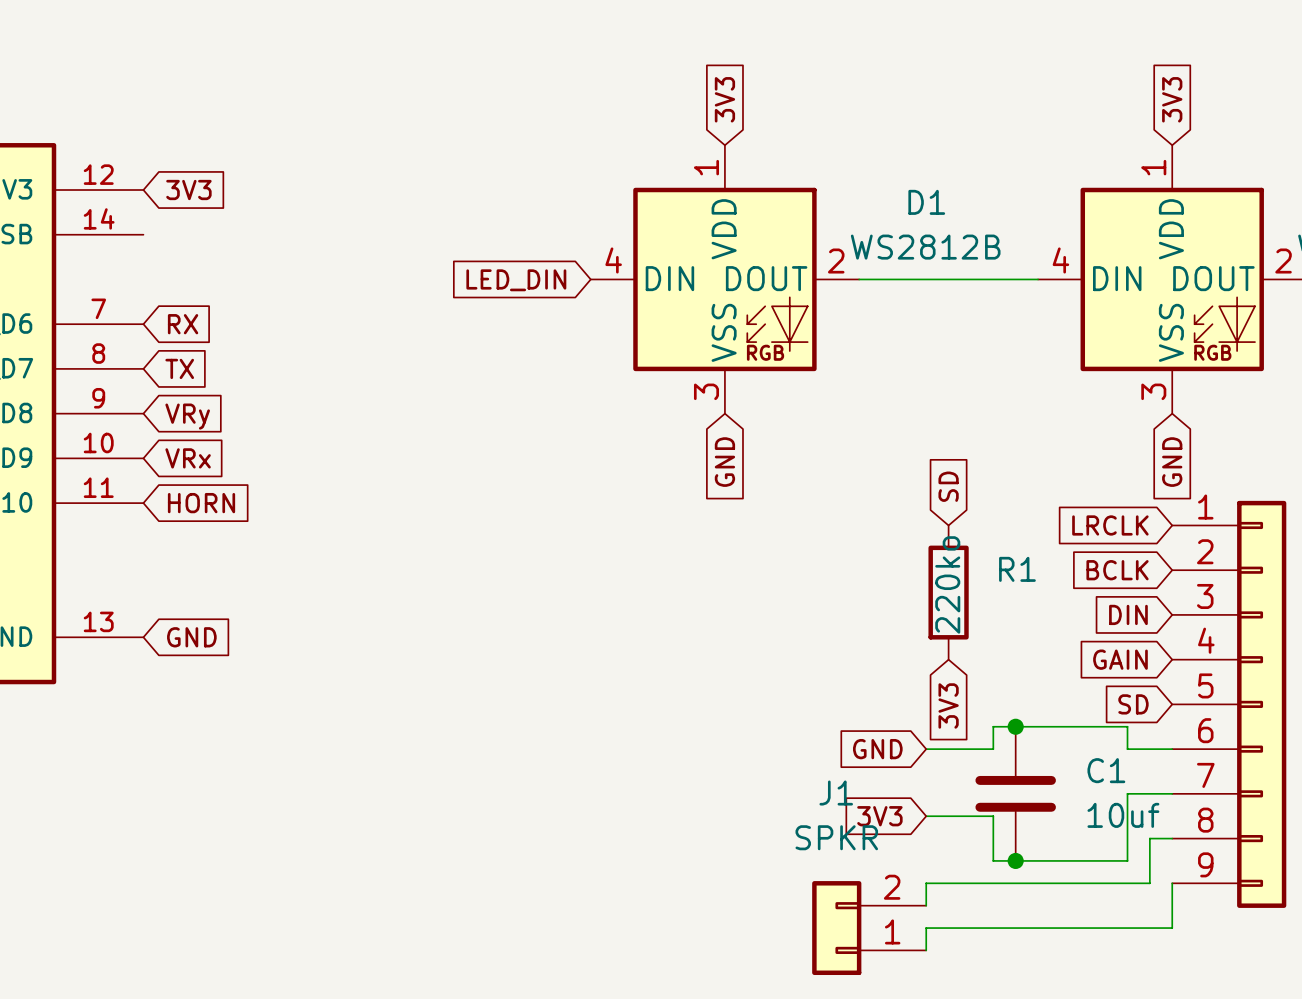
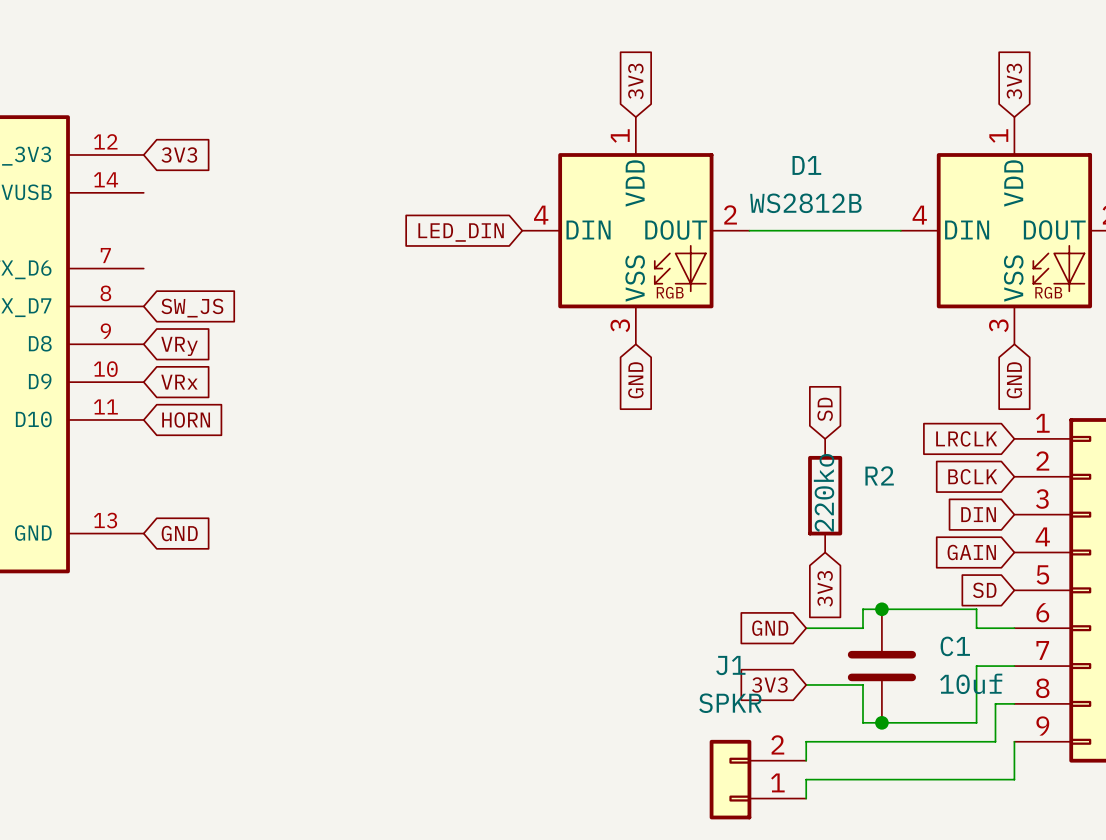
global label: RX (183, 324) -> none
global label: TX (179, 368) -> SW_JS (192, 308)
R1 name: R1 (1017, 569) -> R2 (879, 475)

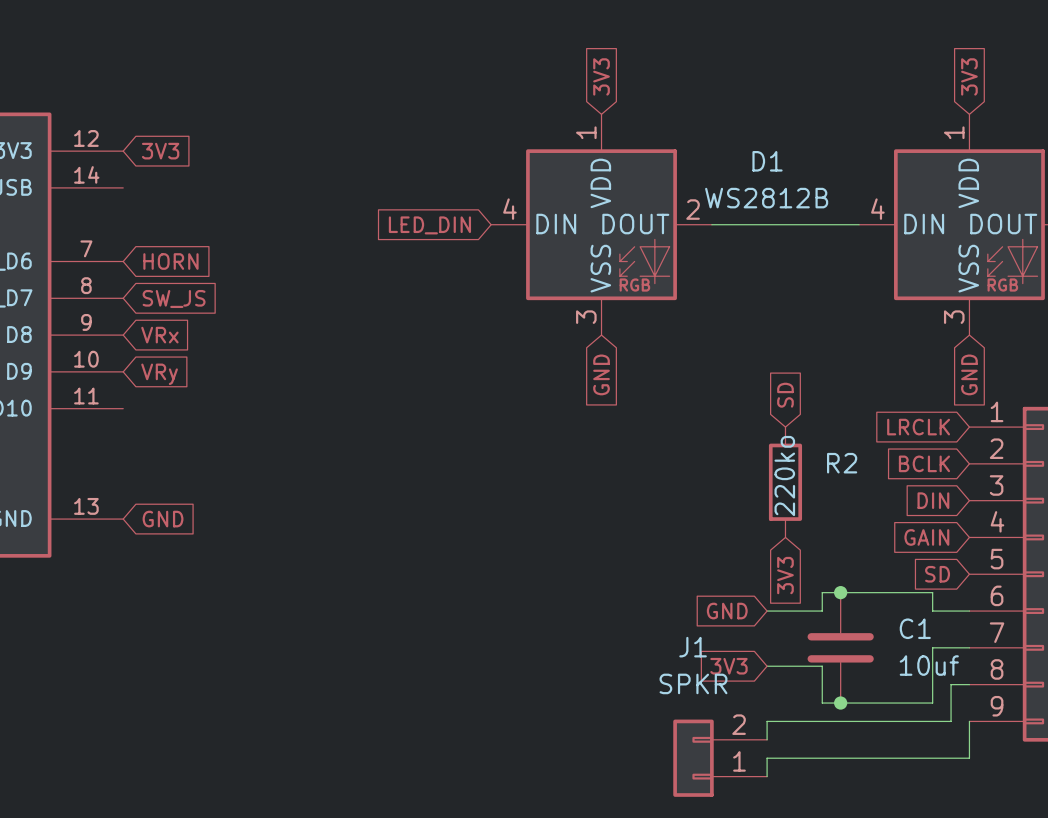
global label: VRy (179, 346) -> VRx (159, 335)
global label: VRx (179, 382) -> VRy (159, 374)
global label position: HORN (186, 419) -> HORN (170, 261)

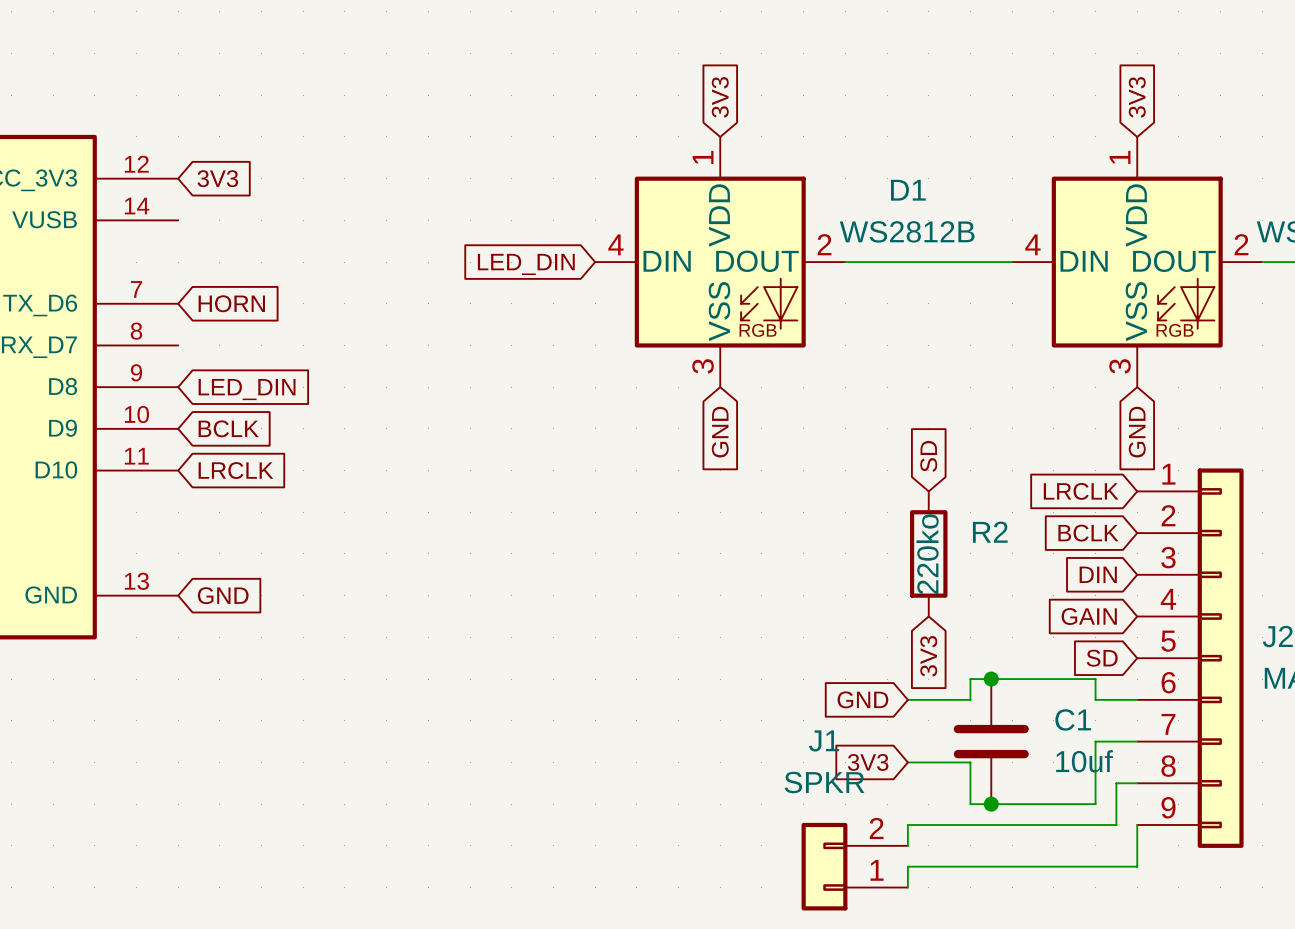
global label: SW_JS (174, 298) -> none
global label: VRx (159, 335) -> LED_DIN (247, 389)
global label: VRy (159, 374) -> BCLK (228, 428)
global label: none -> LRCLK (235, 470)

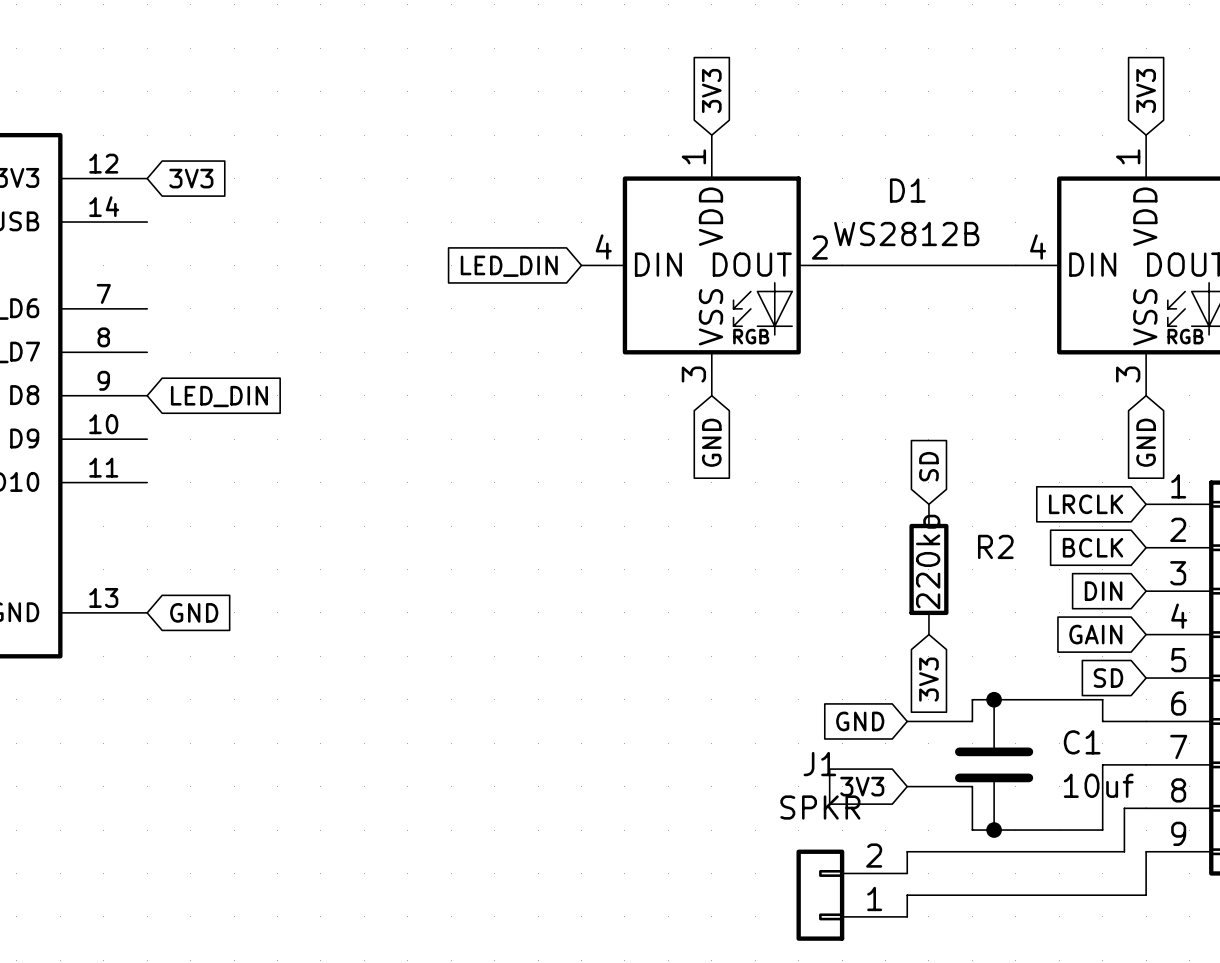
global label: HORN (231, 303) -> none
global label: BCLK (228, 428) -> none
global label: LRCLK (235, 470) -> none

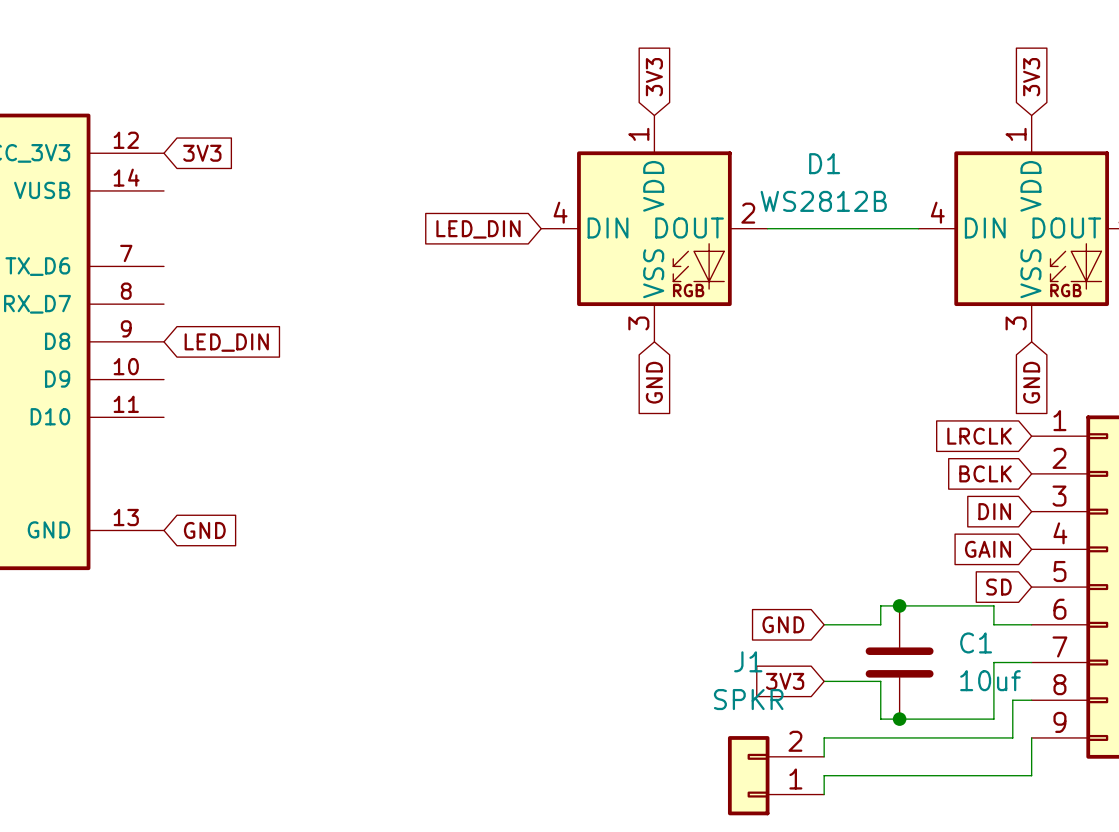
global label: SD (928, 466) -> none
R2: 220ko (928, 569) -> none
global label: 3V3 (928, 679) -> none

